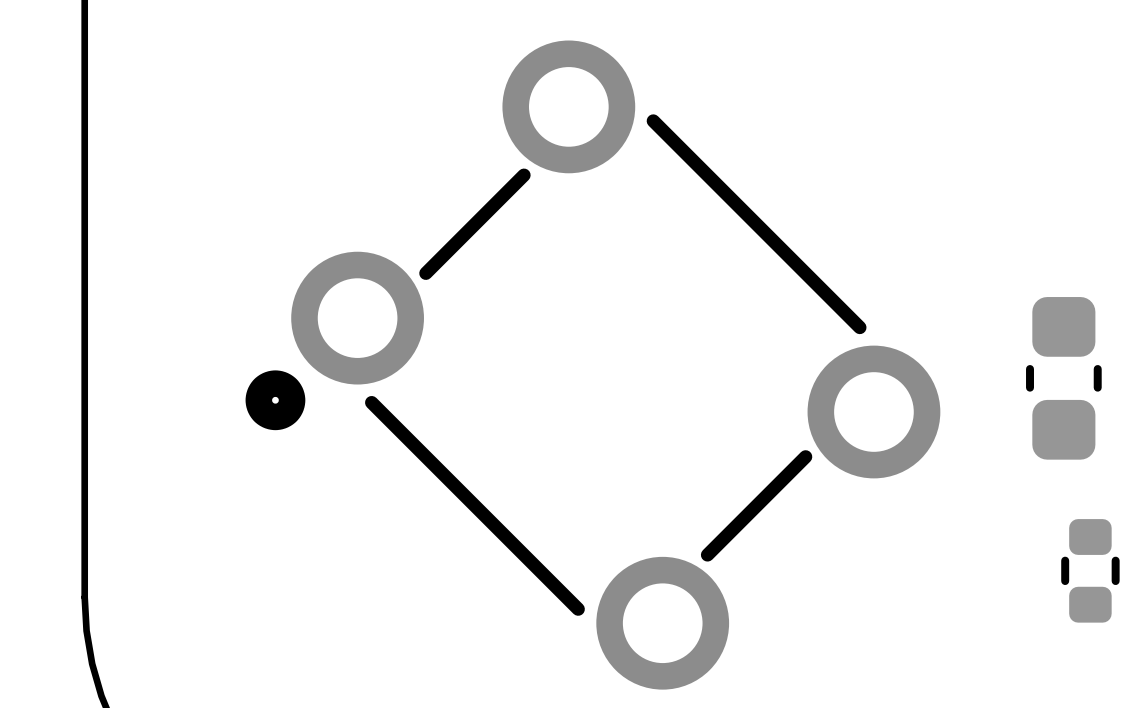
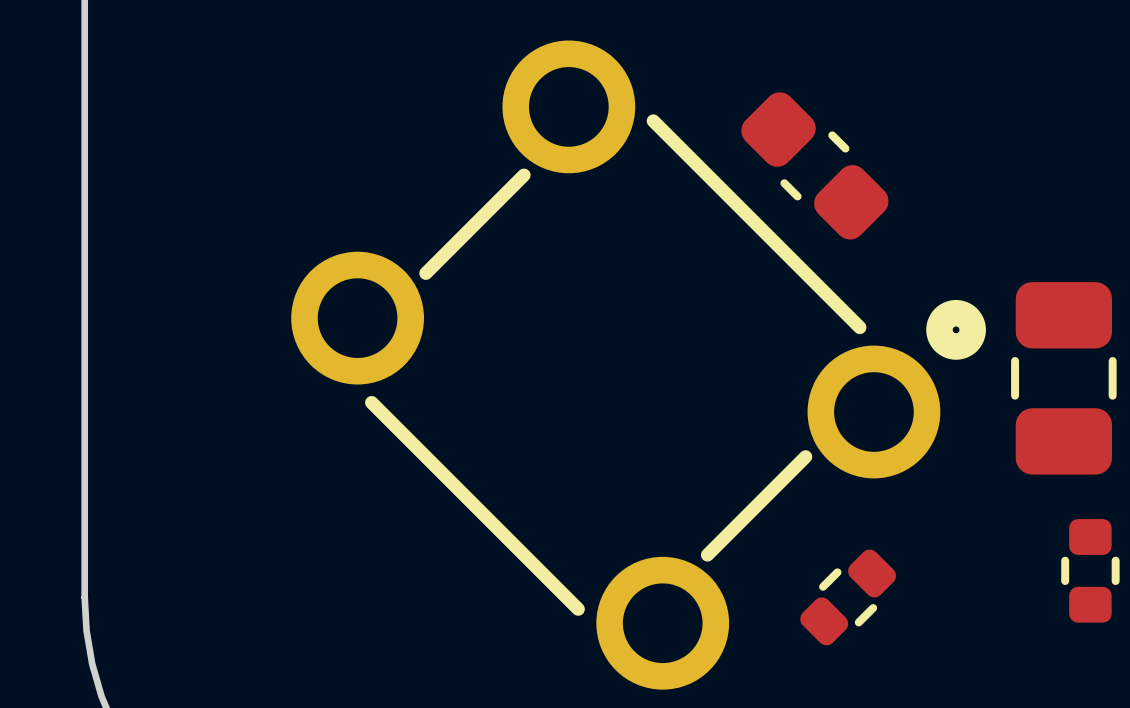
part: none -> (814, 165)
part footprint: [1026, 297, 1102, 460] -> [1011, 282, 1117, 475]
part rotation: 0° (592, 365) -> 180° (638, 365)
part: none -> (848, 597)

